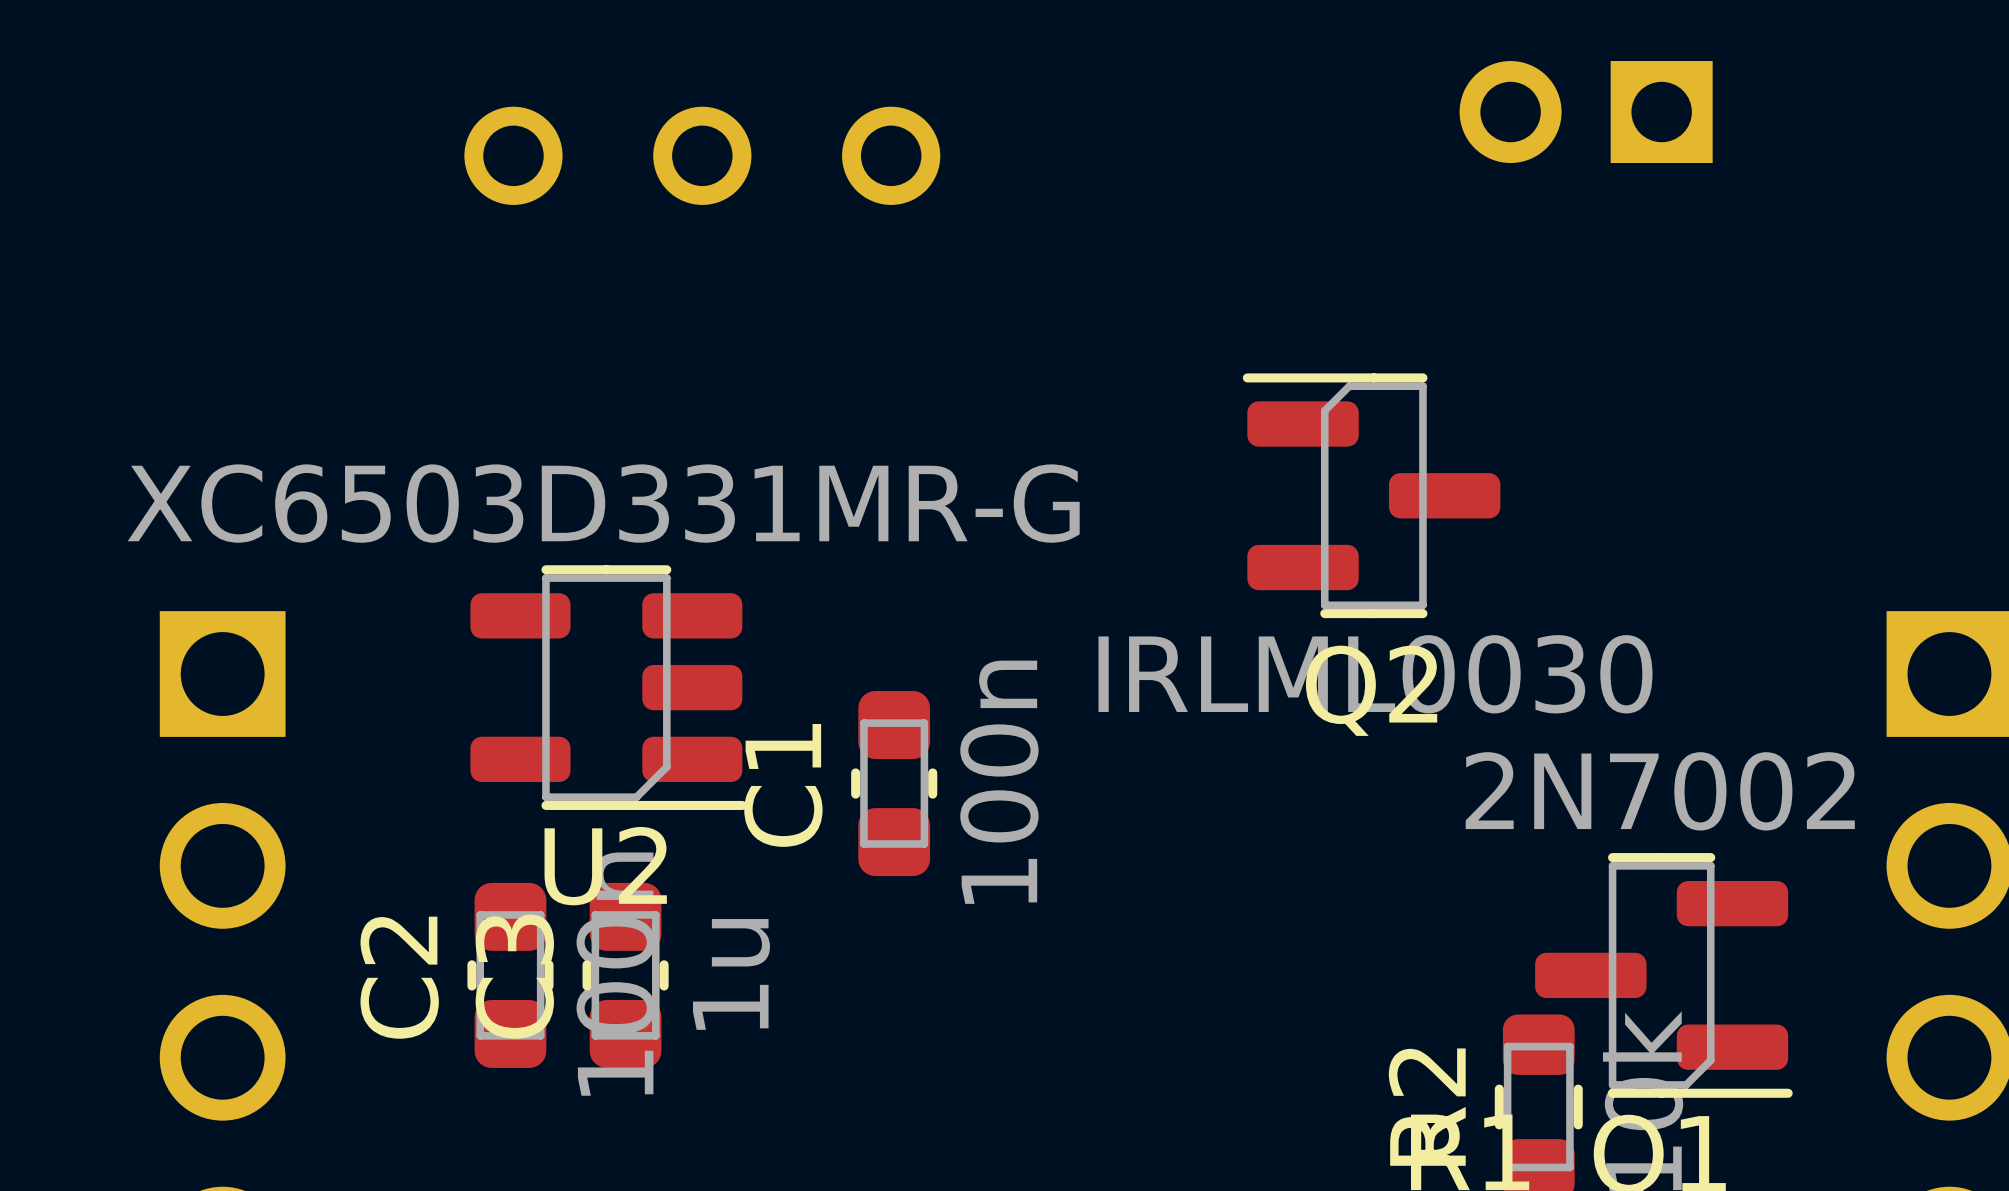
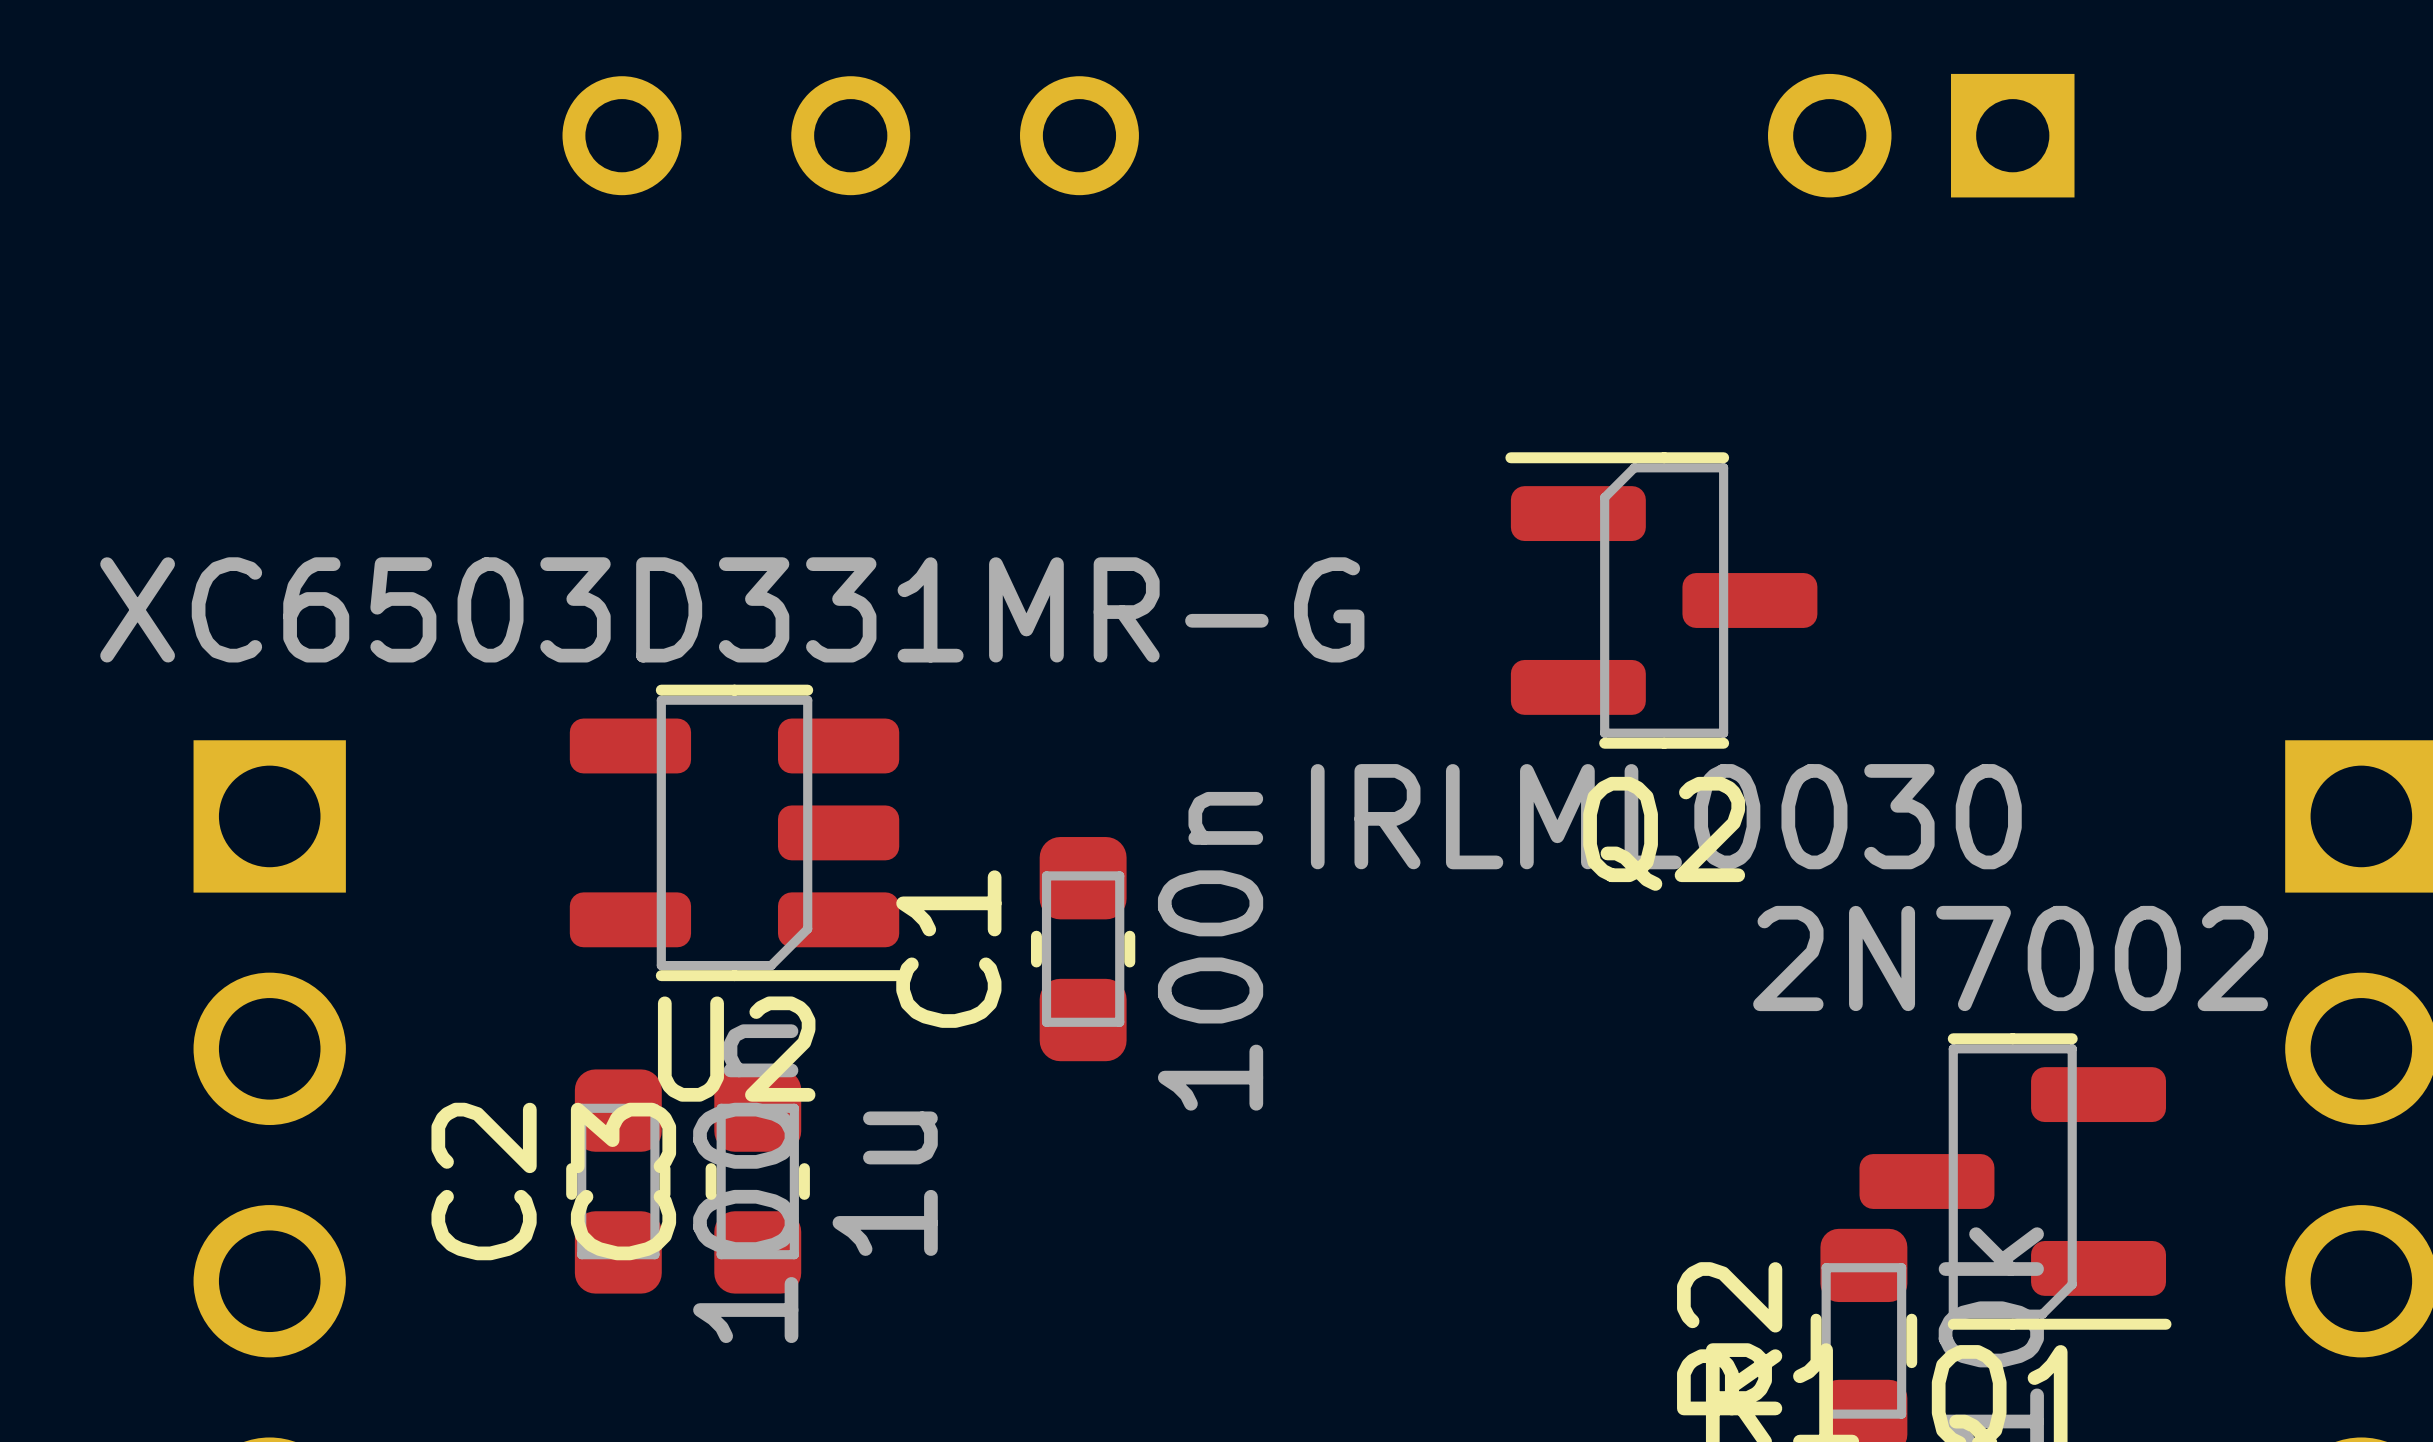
part position: (702, 155) -> (850, 135)

